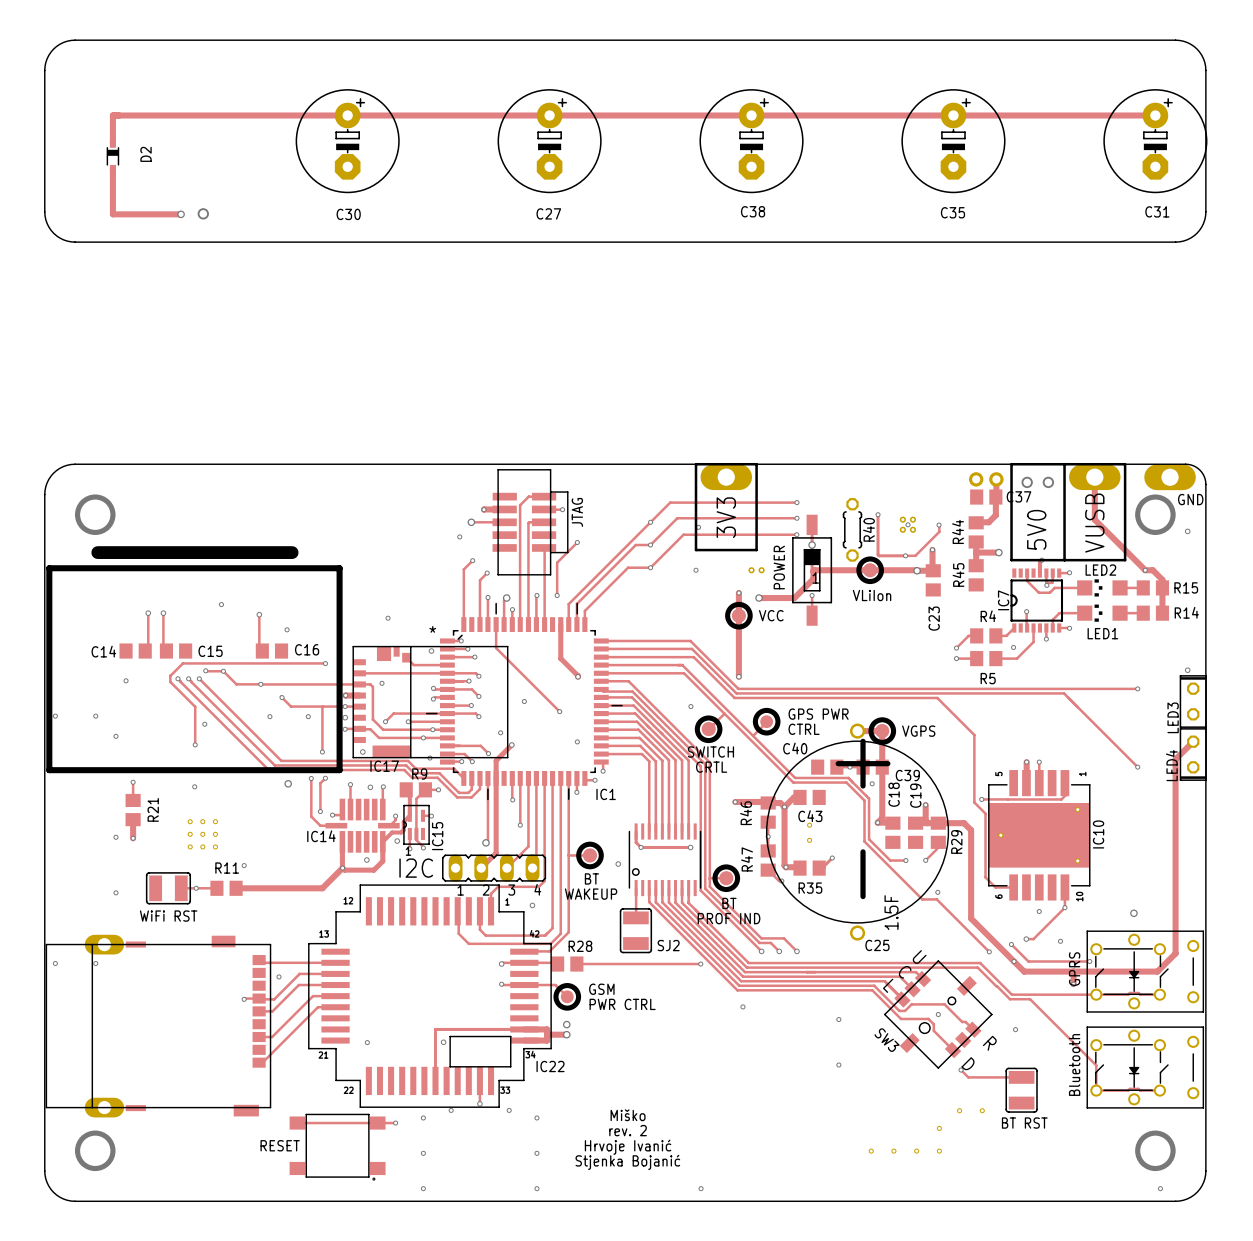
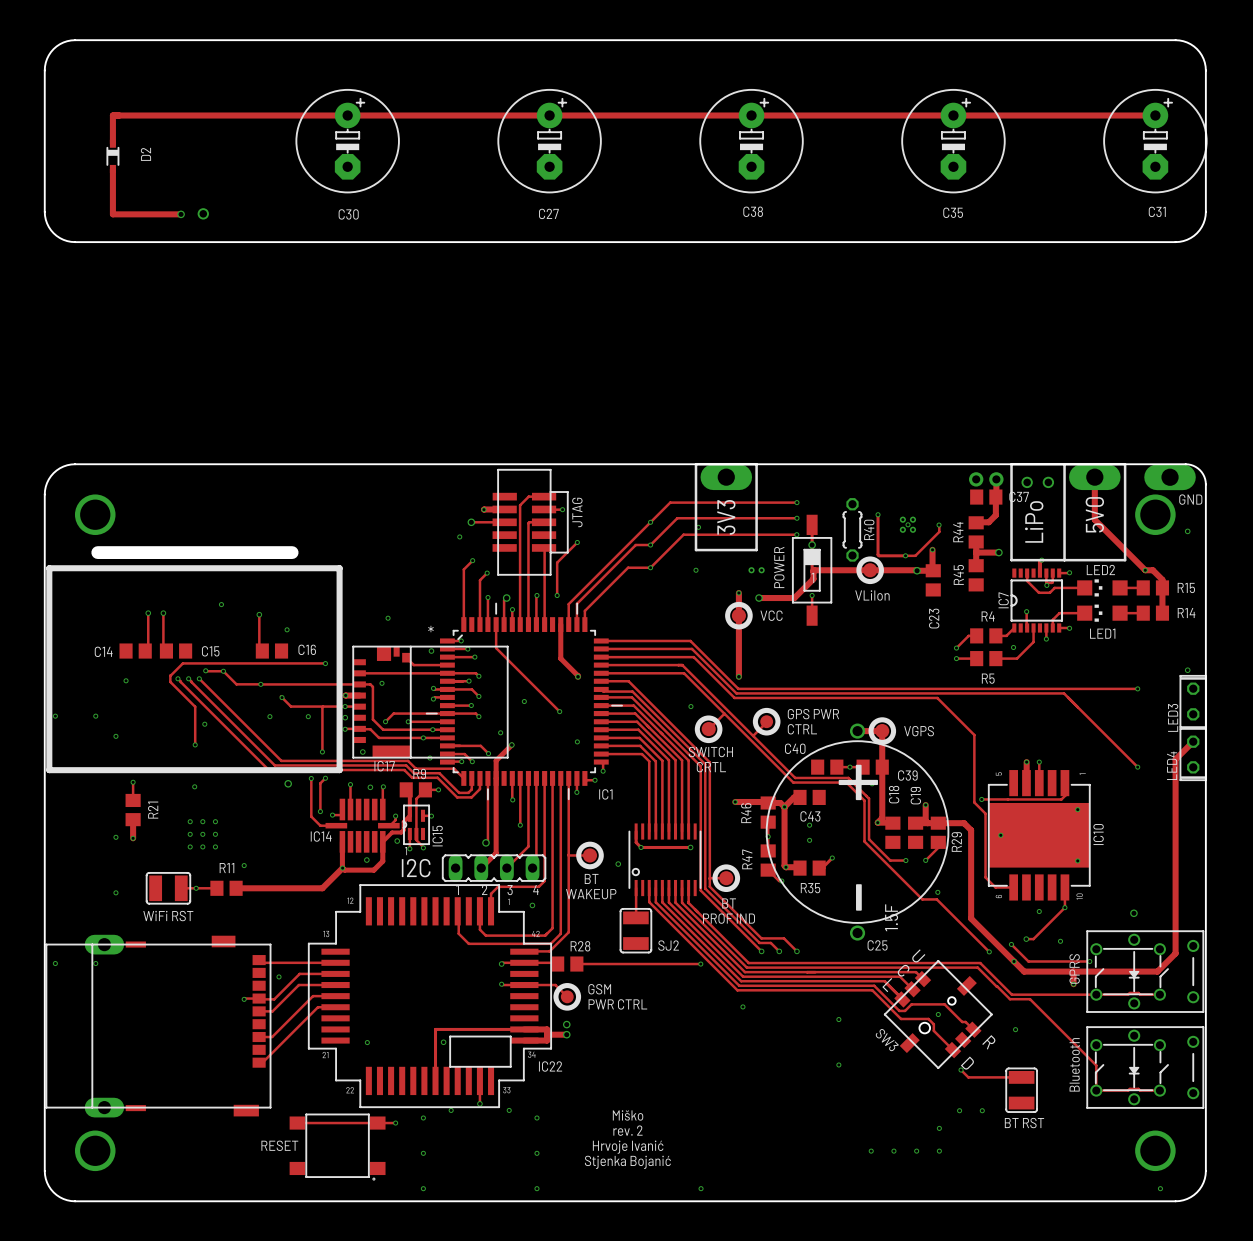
text: none -> LiPo (1034, 521)
text: VUSB (1094, 523) -> none
text position: 5V0 (1036, 529) -> 5V0 (1094, 514)

